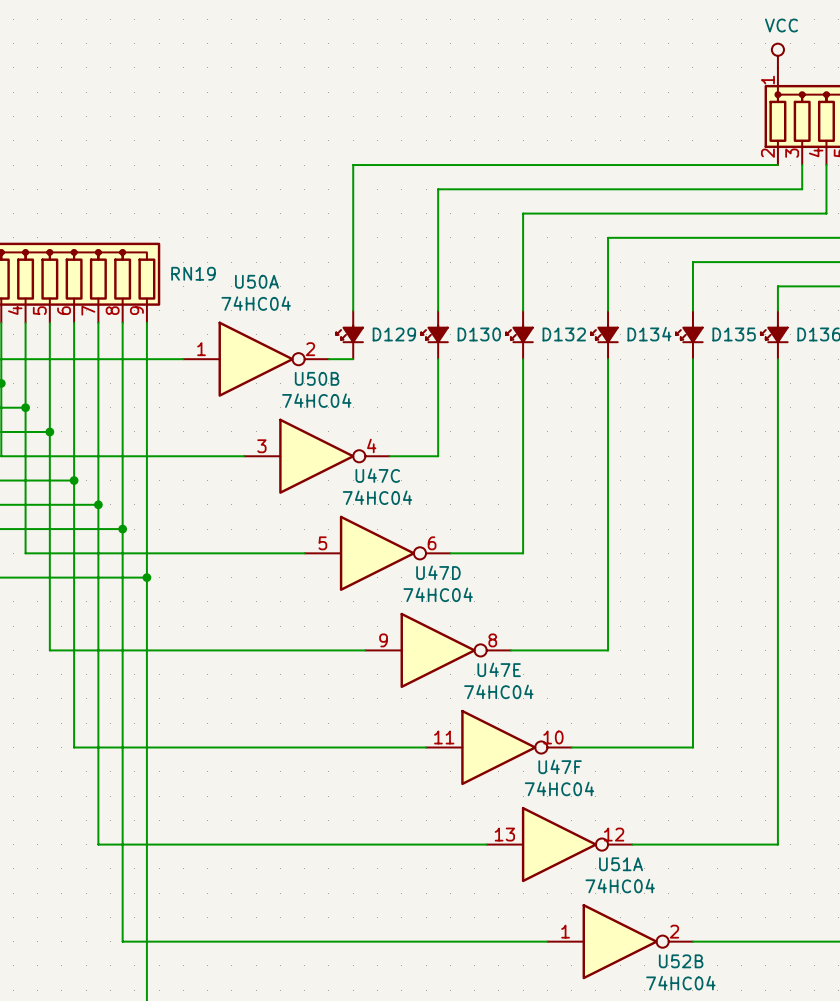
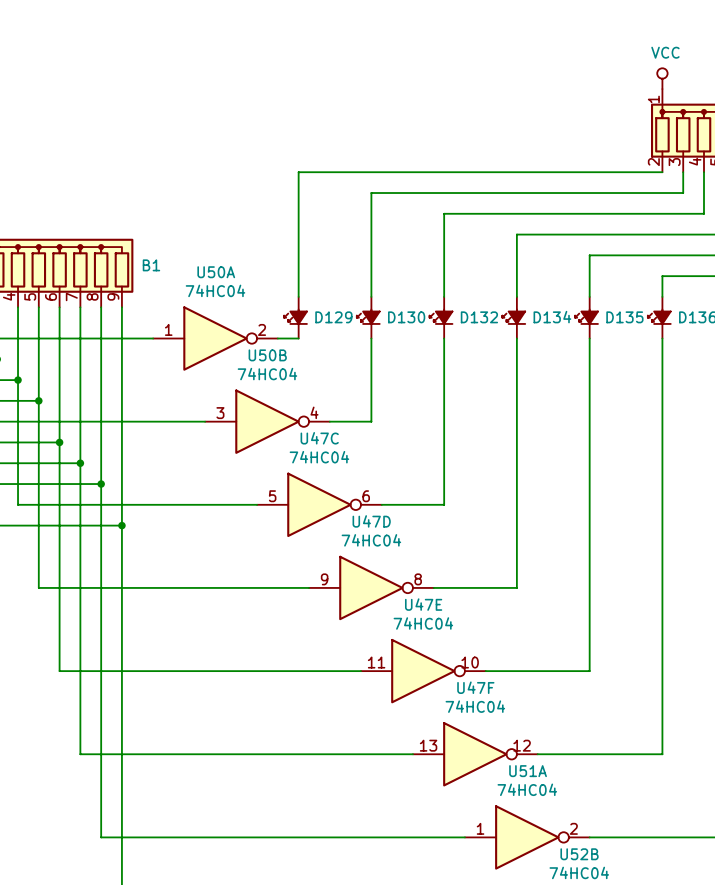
RN19 name: RN19 (193, 273) -> B1 (151, 265)

